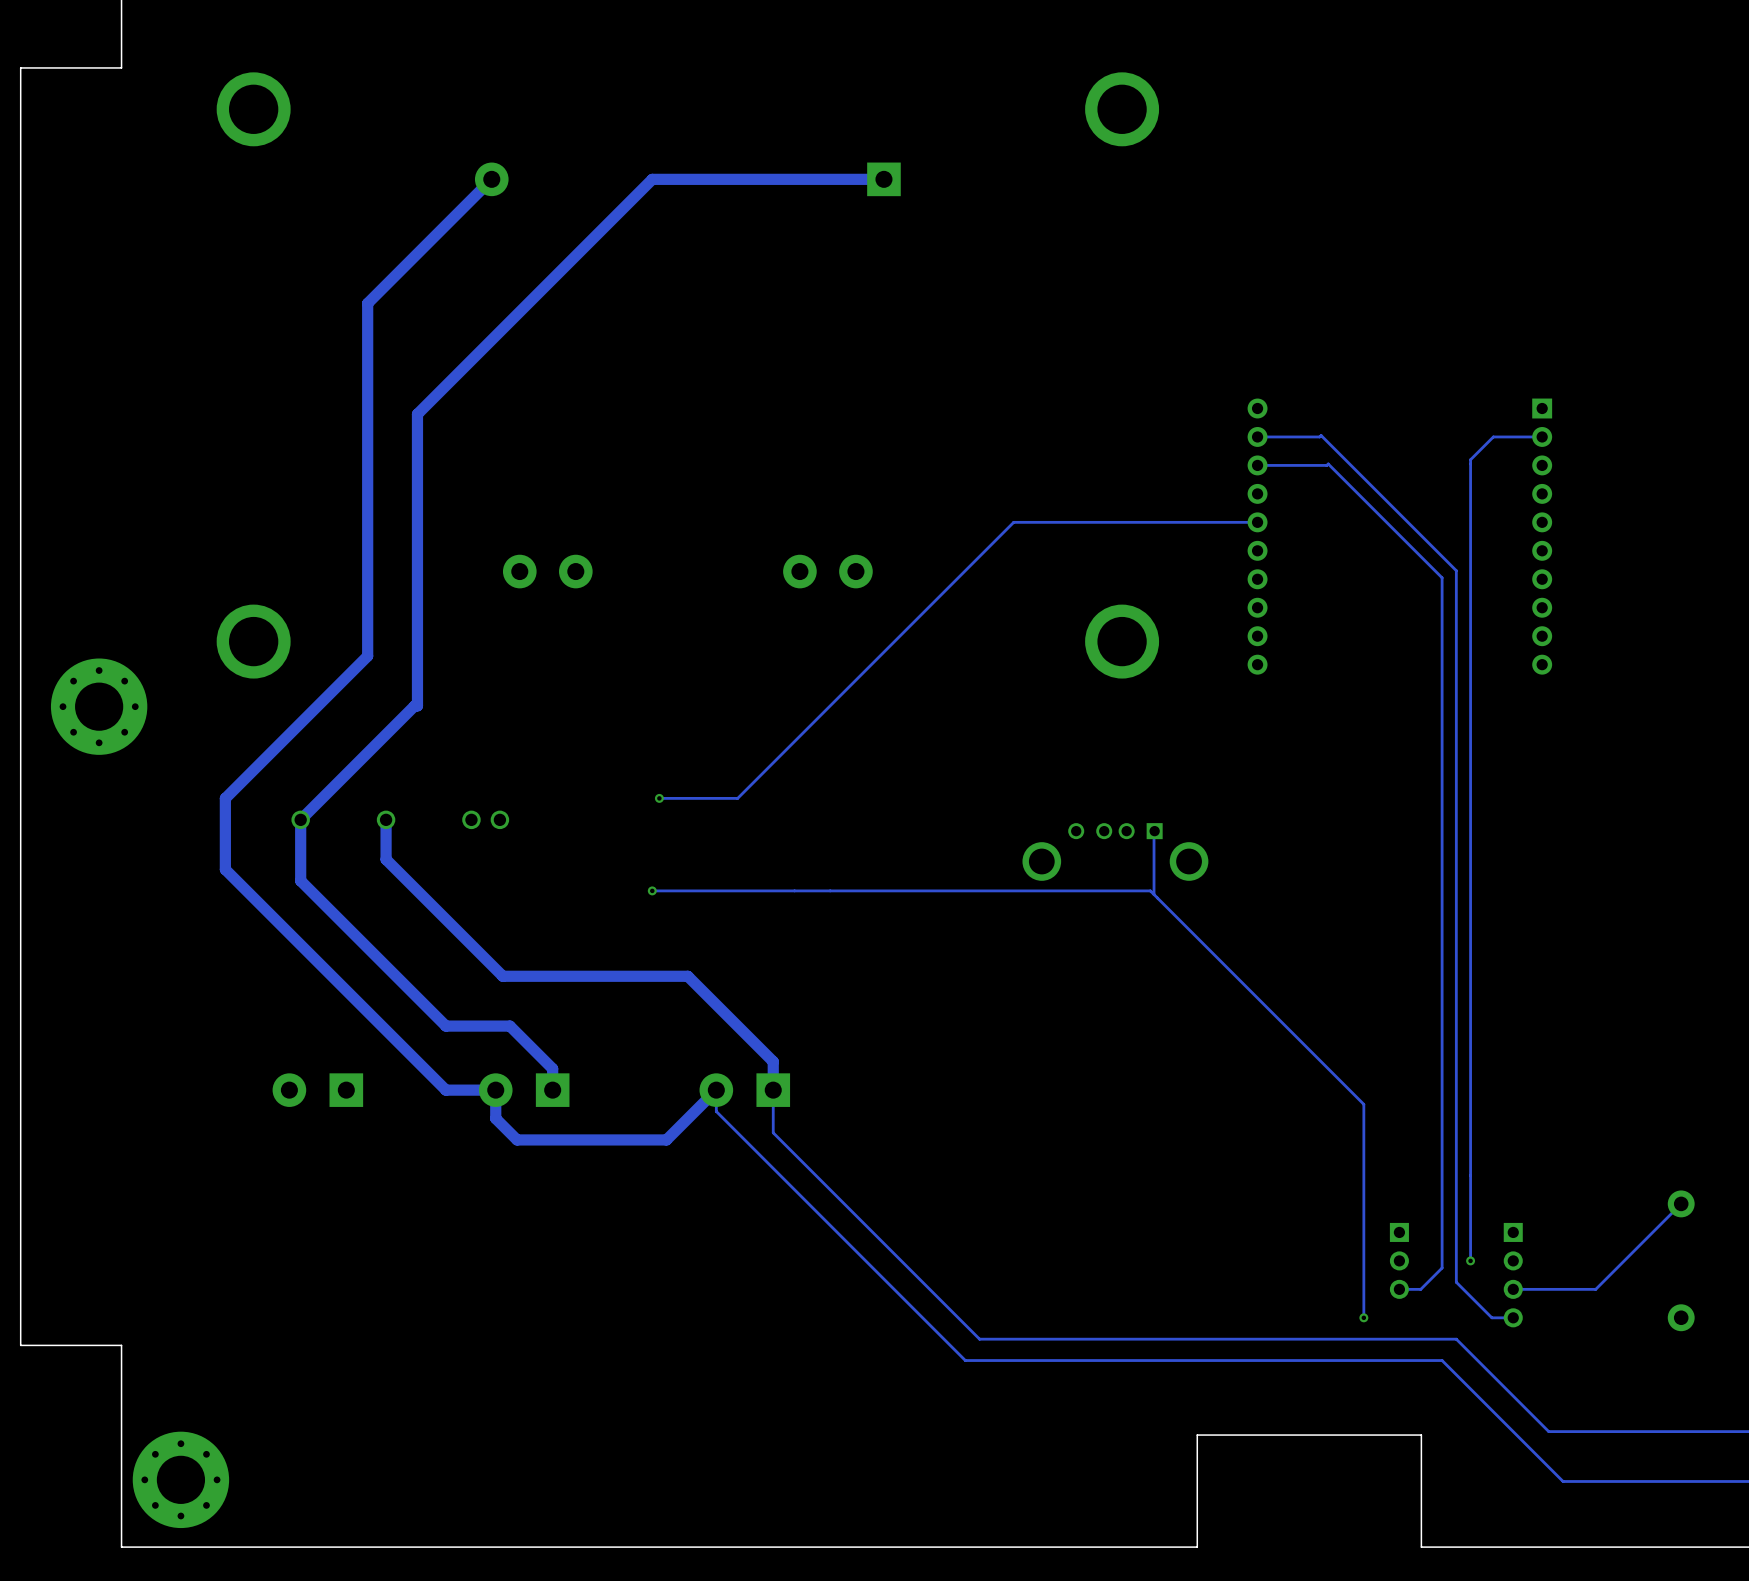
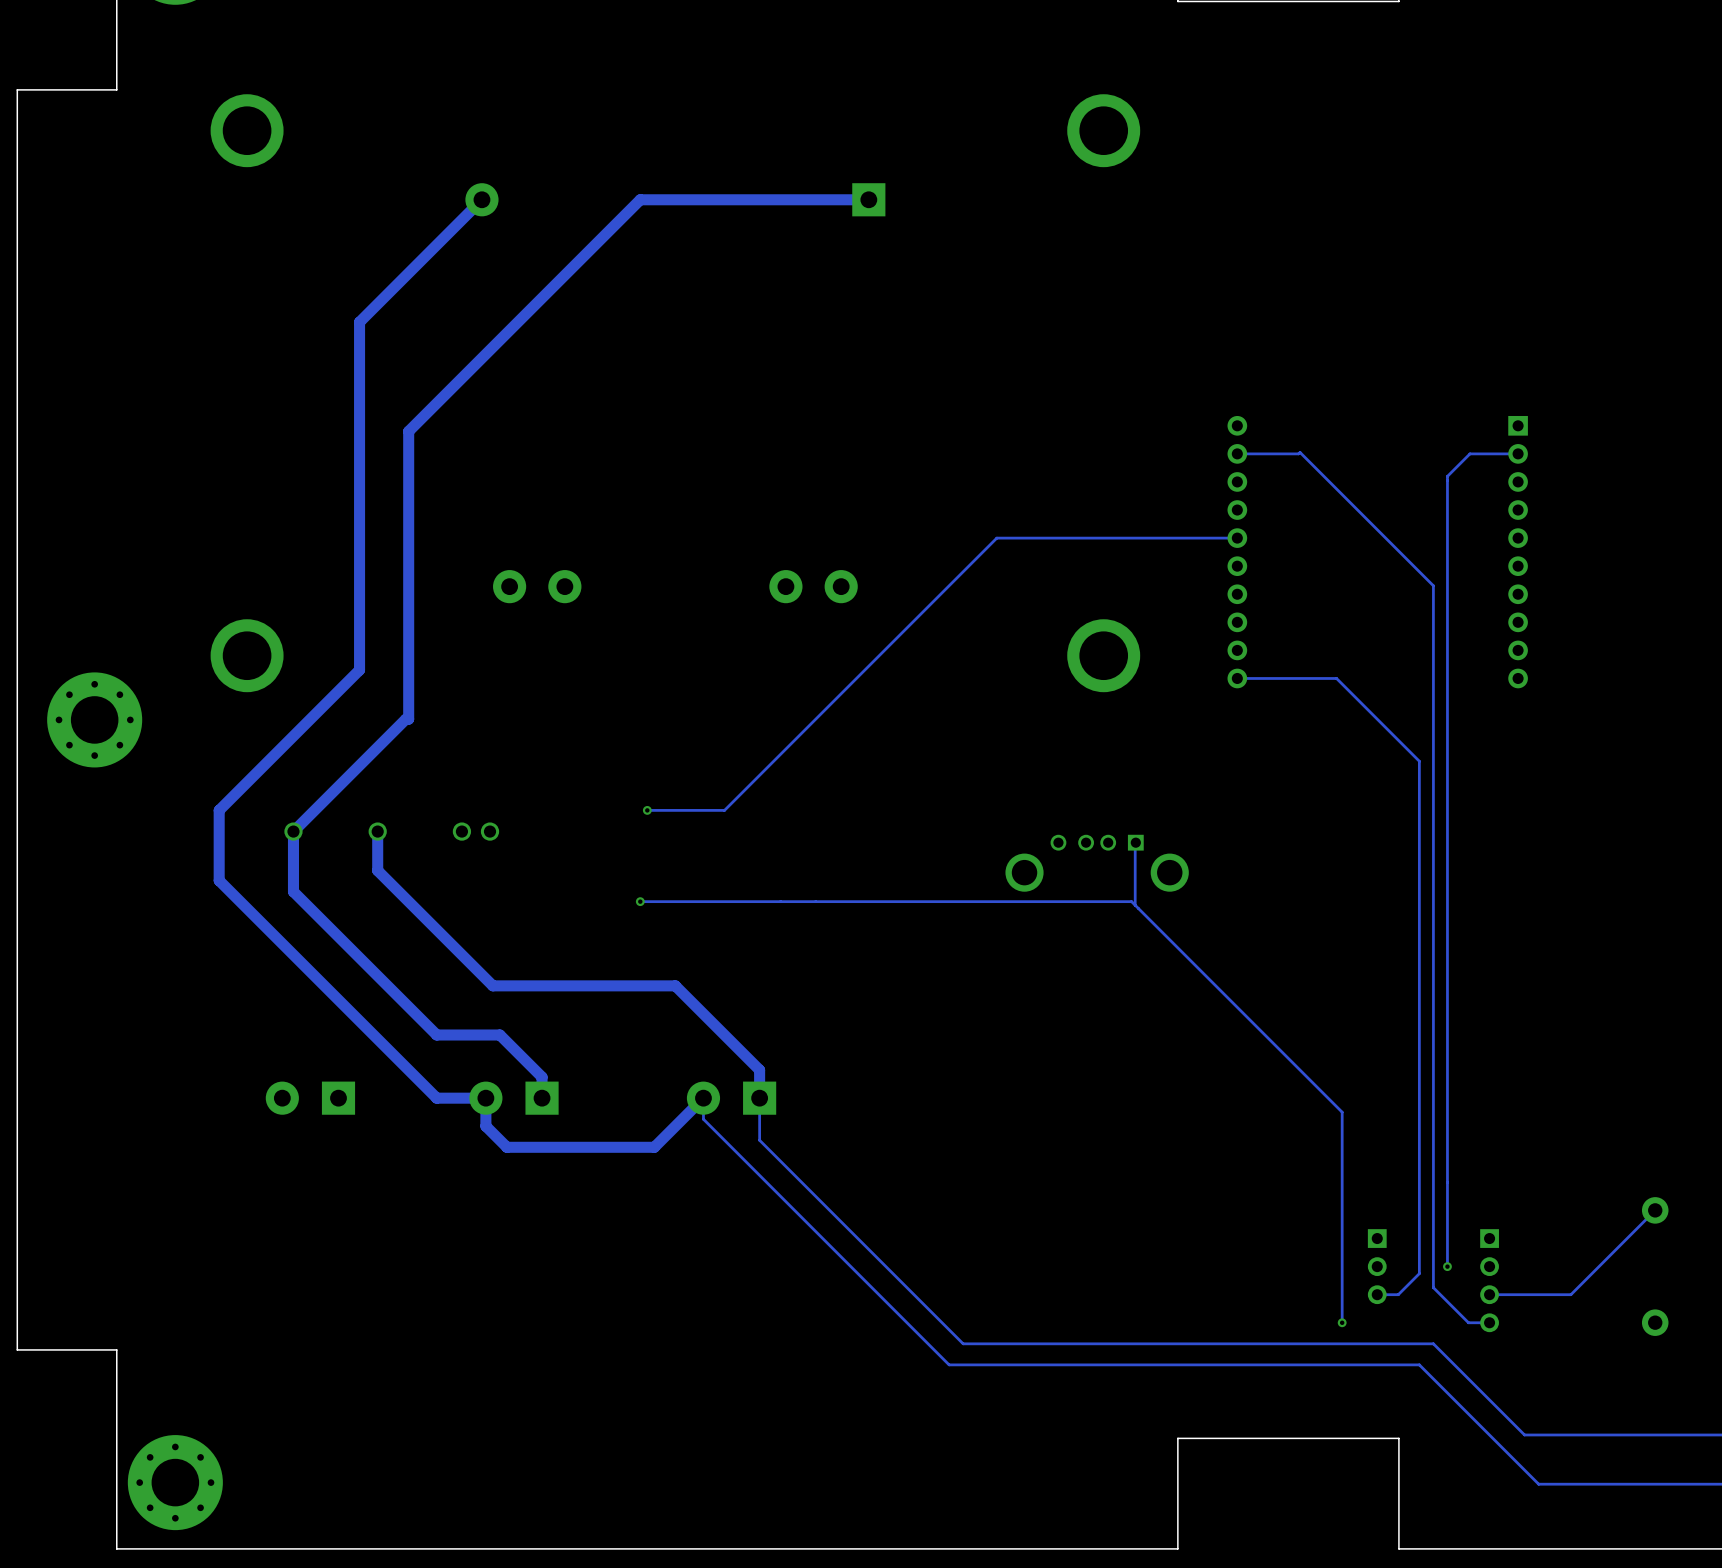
track: (1257, 465) (1328, 463) (1442, 577) (1442, 748) -> (1237, 678) (1336, 678) (1419, 761)

